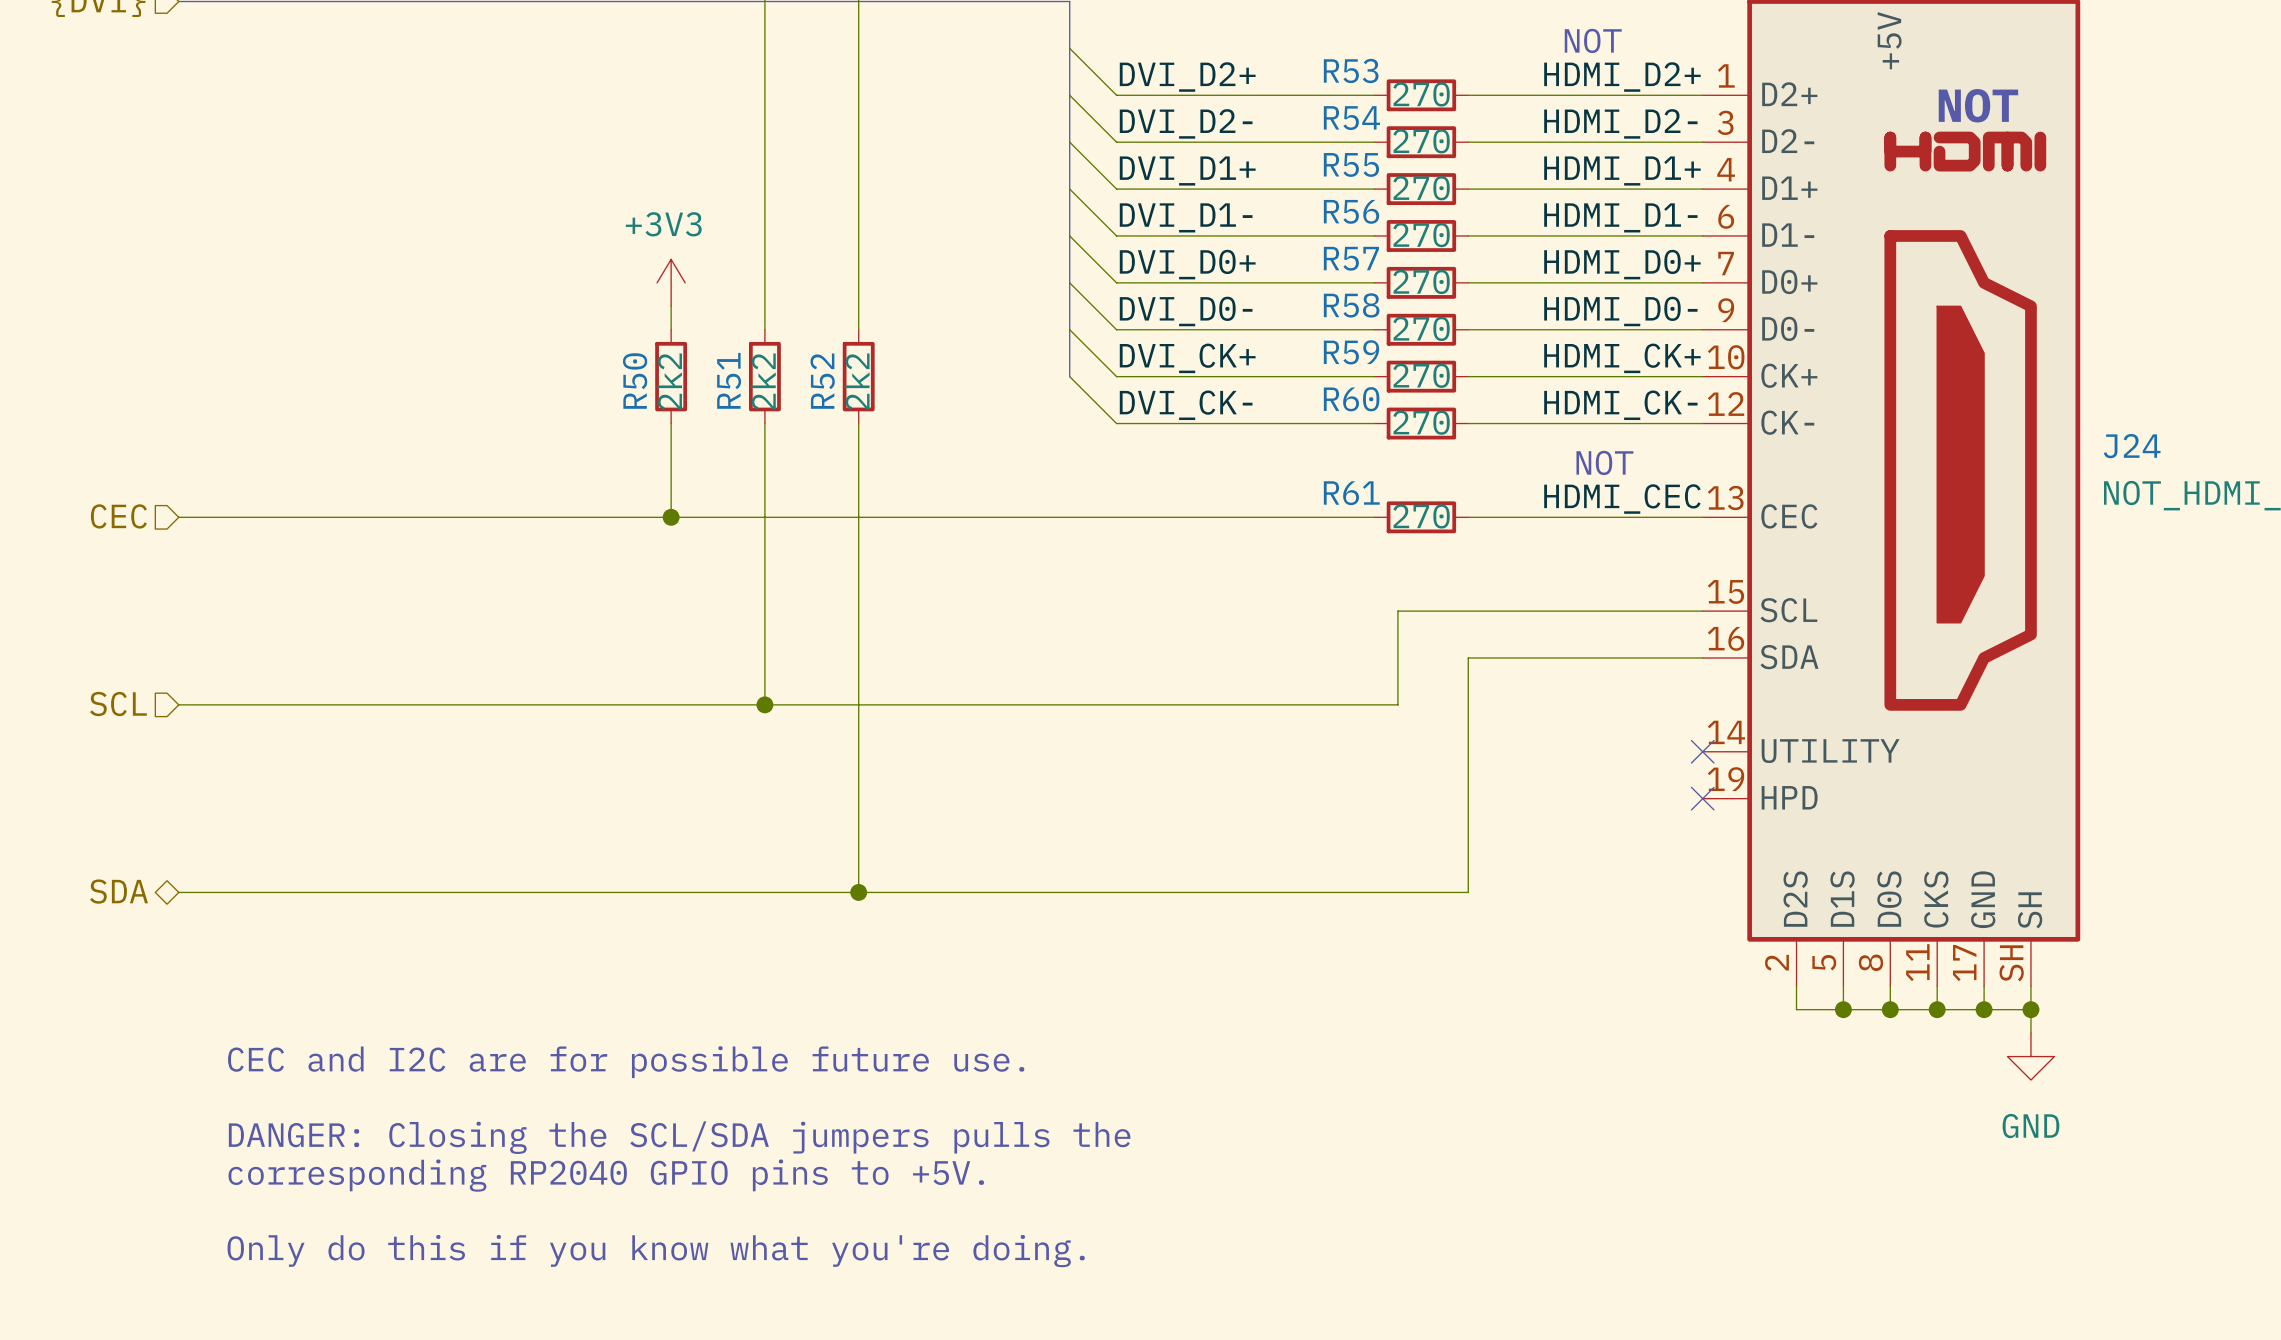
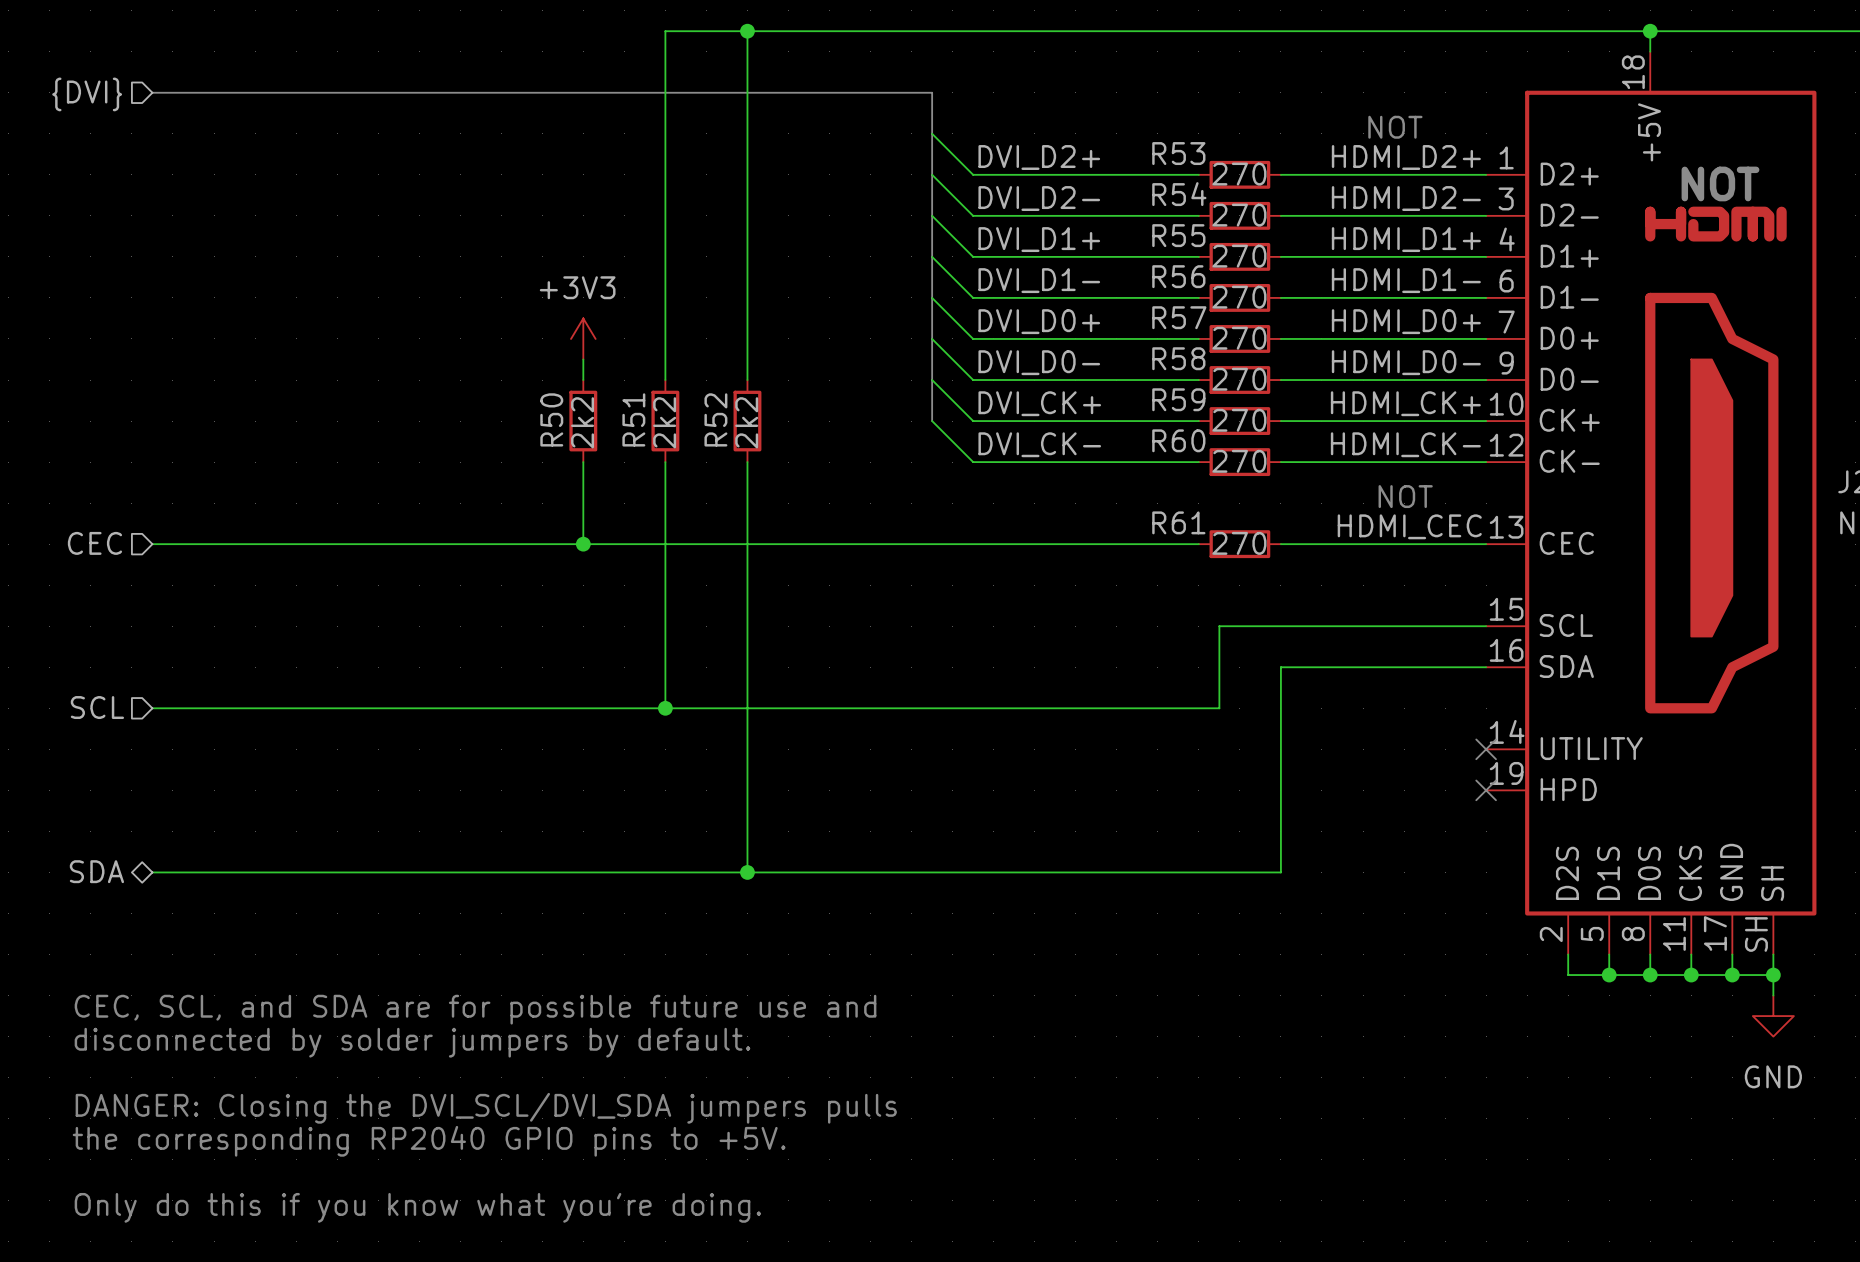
text: CEC and I2C are for possible future use. (626, 1062) -> CEC, SCL, and SDA are for possible future use and (475, 1009)
text: none -> disconnected by solder jumpers by default. (412, 1042)
text: DANGER: Closing the SCL/SDA jumpers pulls the (679, 1137) -> DANGER: Closing the DVI_SCL/DVI_SDA jumpers pulls (486, 1108)
text: corresponding RP2040 GPIO pins to +5V. (606, 1175) -> the corresponding RP2040 GPIO pins to +5V. (429, 1141)
text position: Only do this if you know what you're doing. (656, 1251) -> Only do this if you know what you're doing. (417, 1207)

